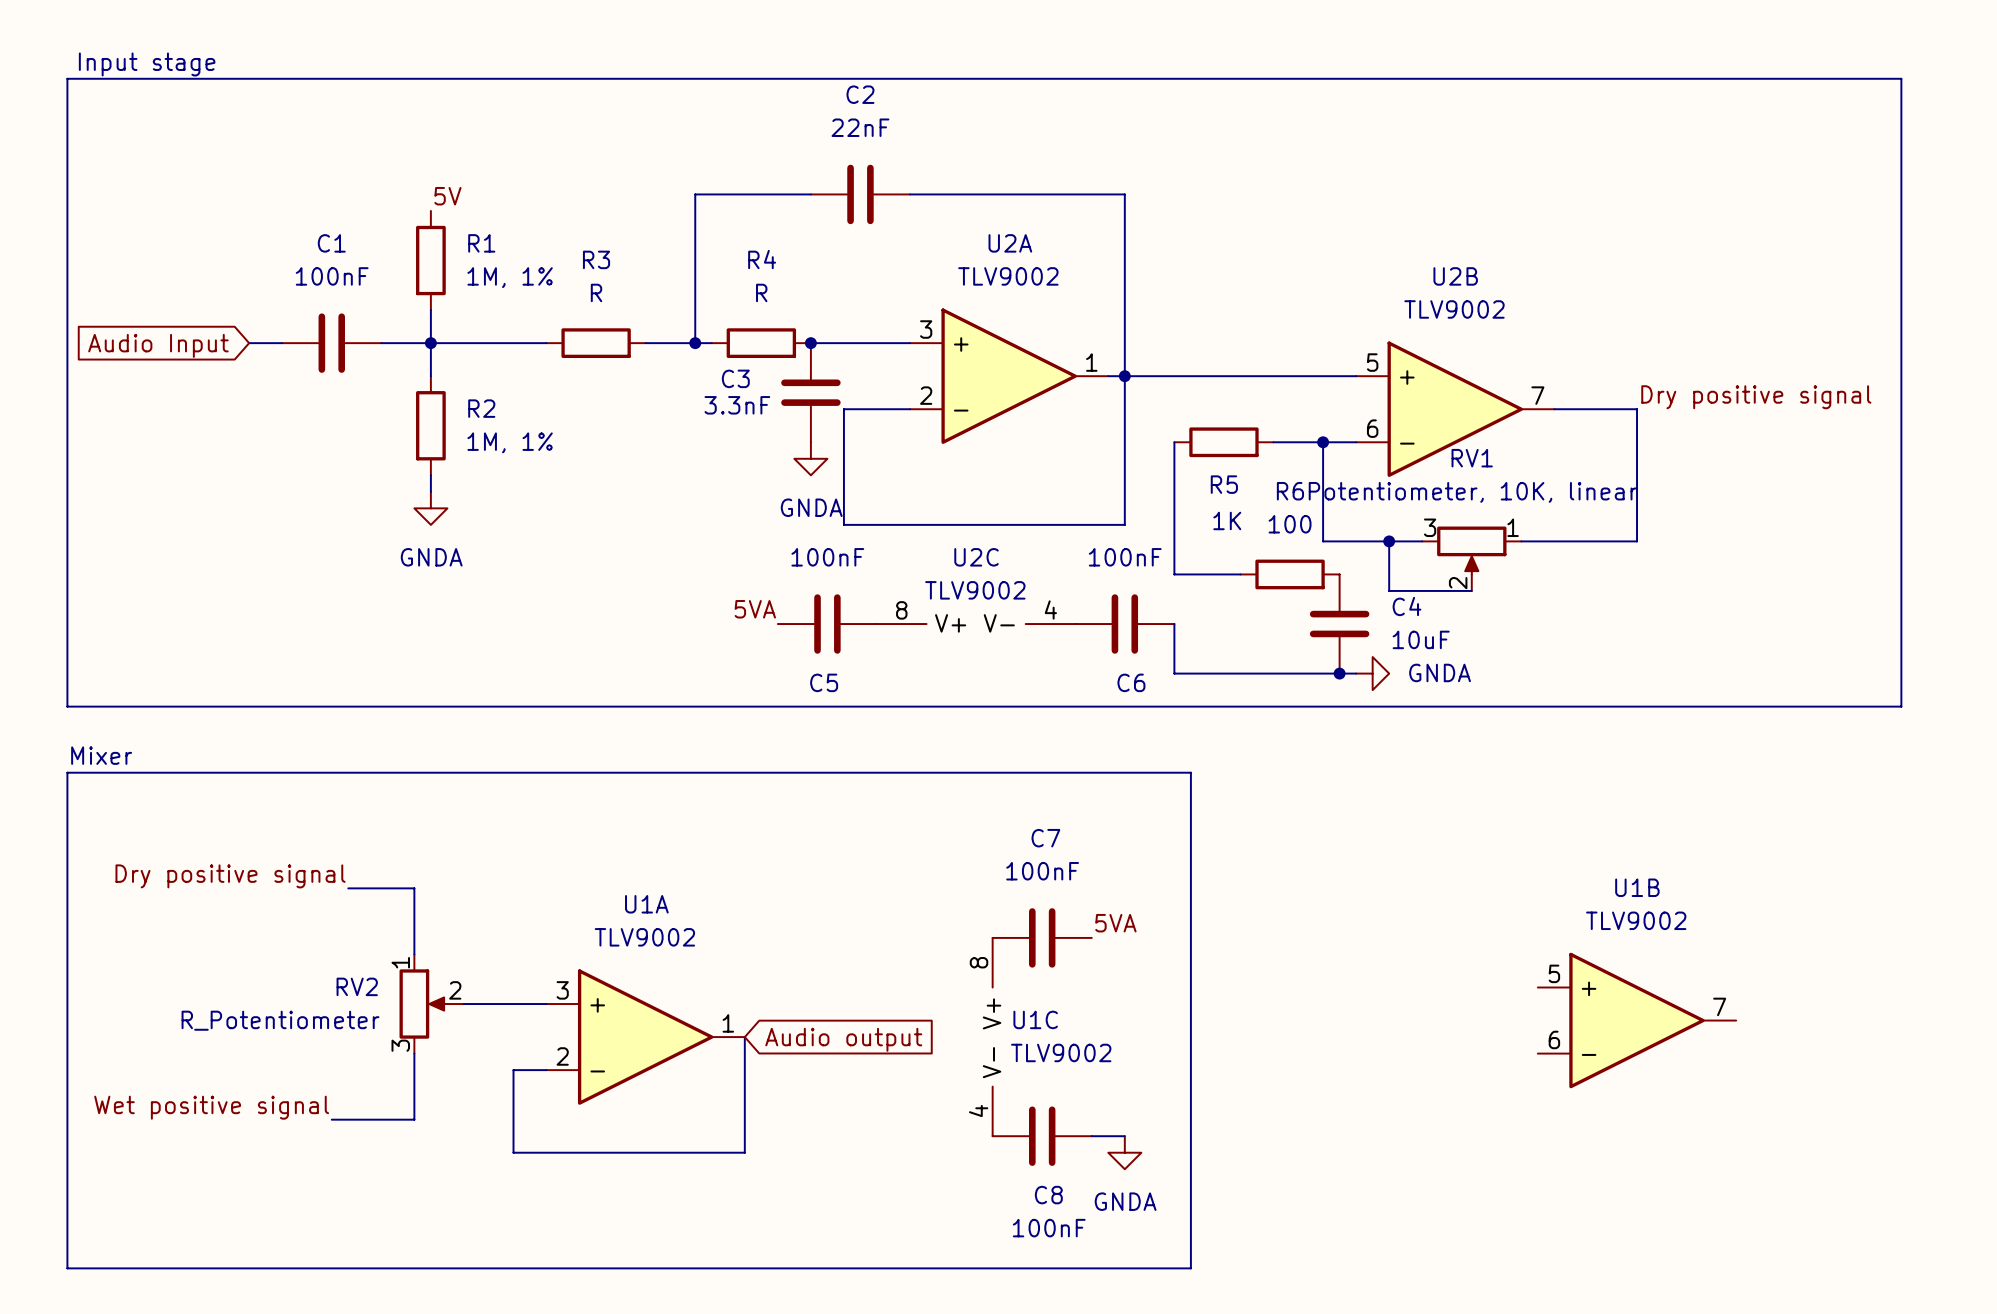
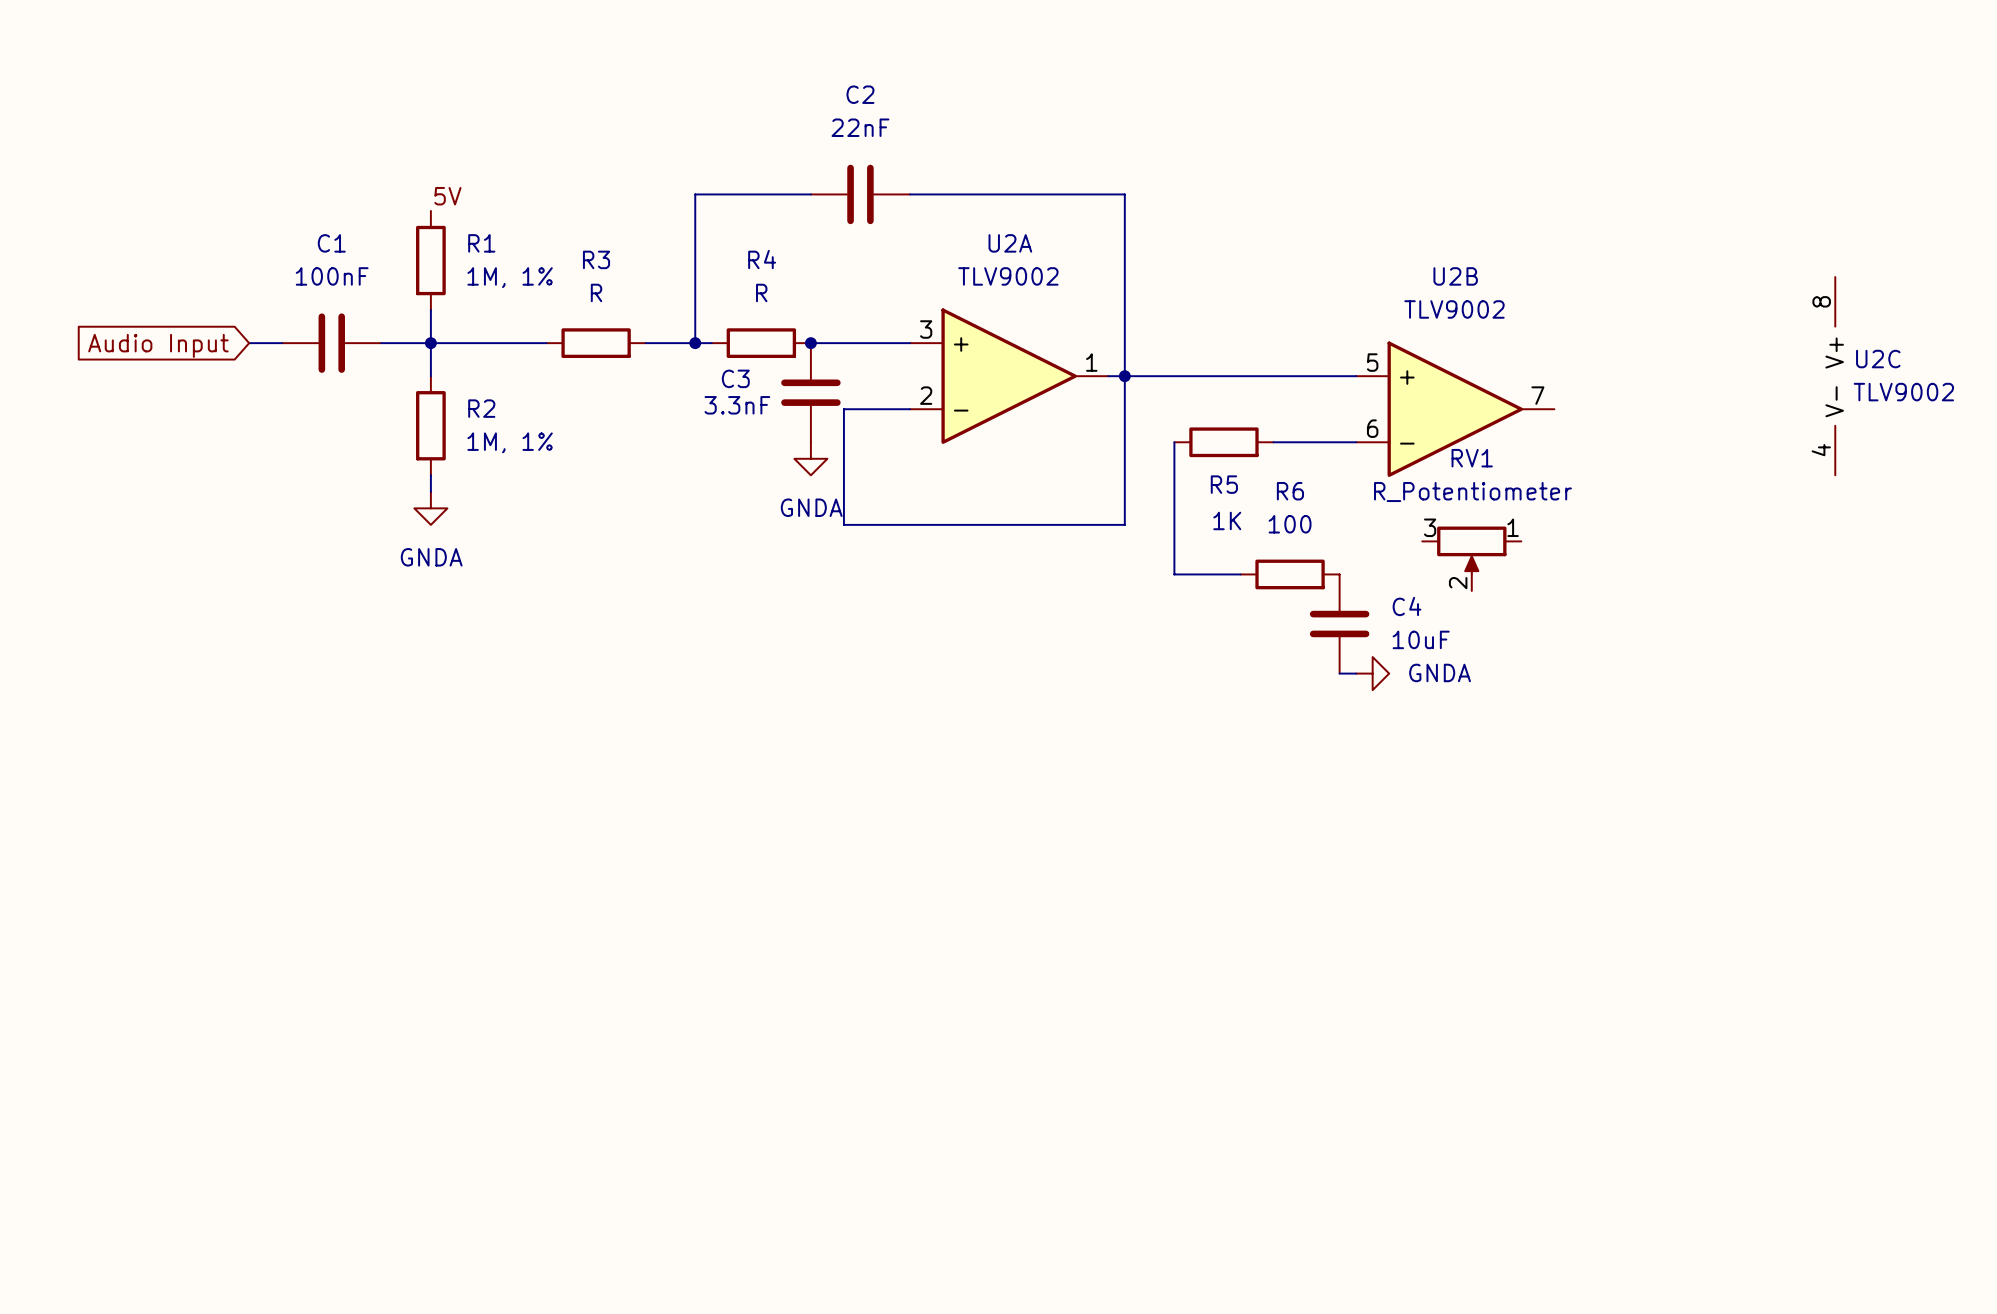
text: Input stage (147, 64) -> none
line: (67, 78) (67, 706) (1901, 706) (1901, 78) (67, 78) -> none
label: Dry positive signal (1756, 397) -> none
wire: (1554, 409) (1637, 409) (1637, 541) (1521, 541) -> none
wire: (1323, 442) (1323, 541) (1422, 541) -> none
junction: (1323, 442) -> none
RV1 value: Potentiometer, 10K, linear (1472, 492) -> R_Potentiometer (1472, 492)
wire: (1389, 541) (1389, 590) (1471, 590) -> none
junction: (1389, 541) -> none
U2C value position: TLV9002 (975, 590) -> TLV9002 (1903, 392)
label: 5VA (755, 609) -> none
C5: 100nF (827, 624) -> none
U2C rotation: 0° (976, 624) -> 90° clockwise (1835, 376)
U2C position: (976, 624) -> (1835, 376)
C6: 100nF (1124, 624) -> none
wire: (1174, 624) (1174, 673) (1339, 673) -> none
junction: (1339, 673) -> none
text: Mixer (101, 755) -> none
line: (67, 772) (1190, 772) (1190, 1268) (67, 1268) (67, 772) -> none
label: Dry positive signal (230, 876) -> none
wire: (348, 888) (414, 888) (414, 954) -> none
label: 5VA (1115, 923) -> none
C7: 100nF (1042, 937) -> none
RV2: R_Potentiometer (431, 1004) -> none
wire: (463, 1004) (546, 1004) -> none
U1B: TLV9002 (1637, 1020) -> none
U1A: TLV9002 (645, 1037) -> none
wire: (744, 1037) (744, 1152) (513, 1152) (513, 1070) (546, 1070) -> none
U1C: TLV9002 (992, 1037) -> none
global label: Audio output (843, 1039) -> none
wire: (414, 1053) (414, 1119) (331, 1119) -> none
label: Wet positive signal (211, 1107) -> none
C8: 100nF (1042, 1136) -> none
wire: (1091, 1136) (1124, 1136) -> none
power symbol: GNDA (1124, 1152) -> none

